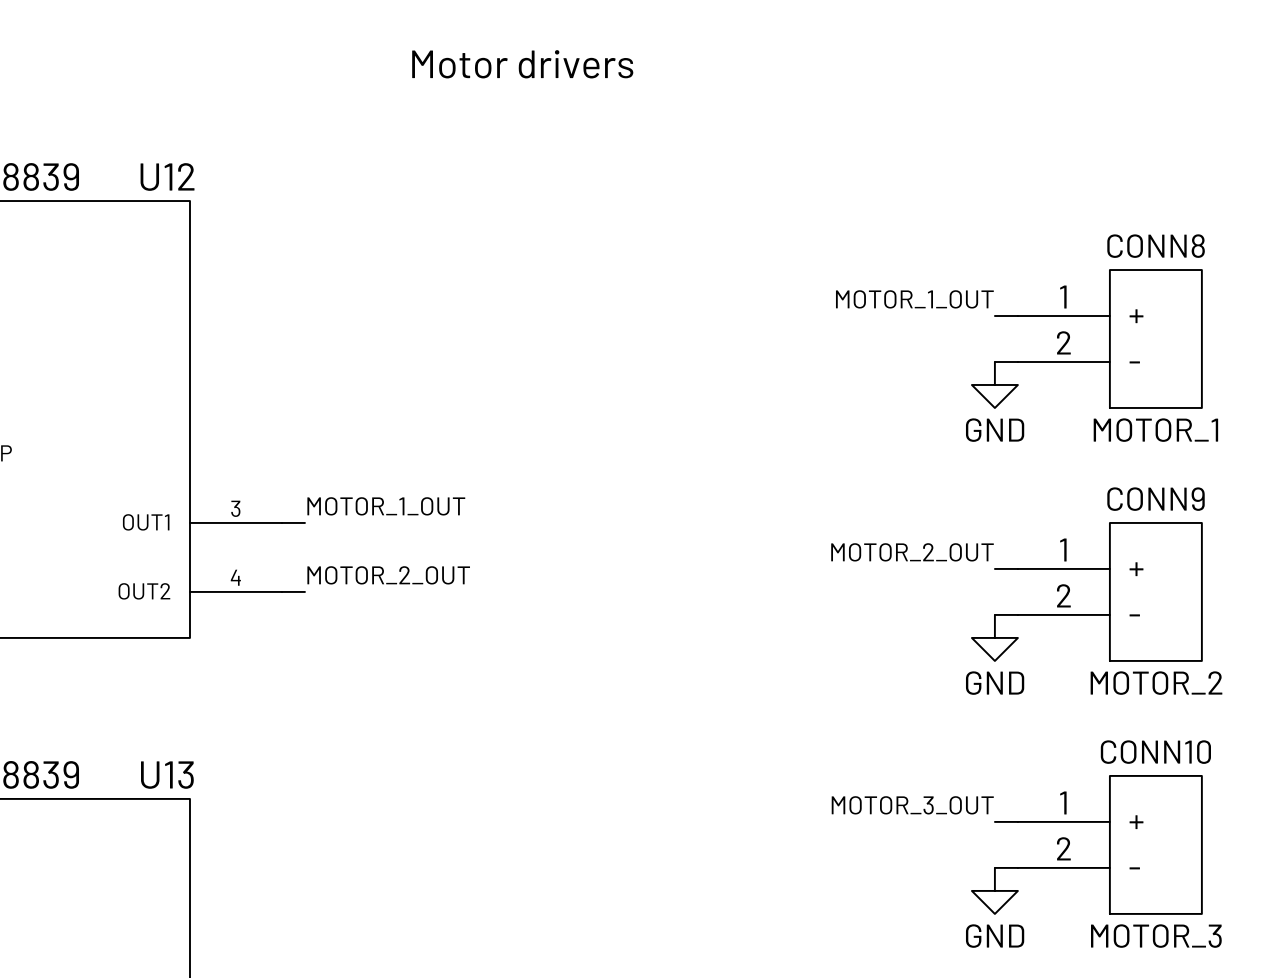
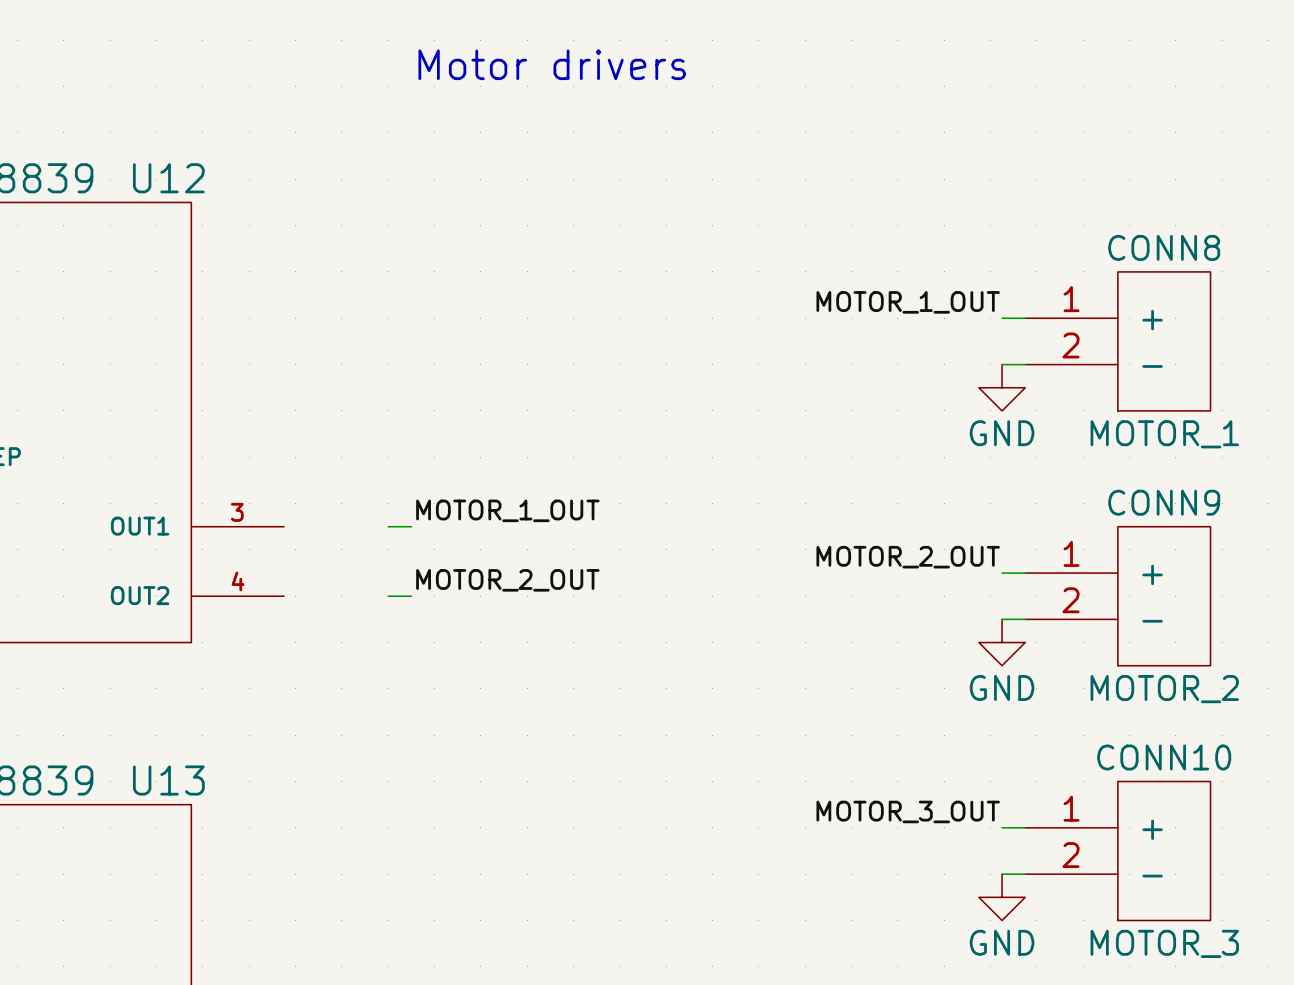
label position: MOTOR_1_OUT (386, 506) -> MOTOR_1_OUT (507, 510)
wire: (281, 522) (304, 522) -> (388, 526) (411, 526)
label position: MOTOR_2_OUT (388, 575) -> MOTOR_2_OUT (507, 580)
wire: (281, 591) (304, 591) -> (388, 596) (411, 596)

